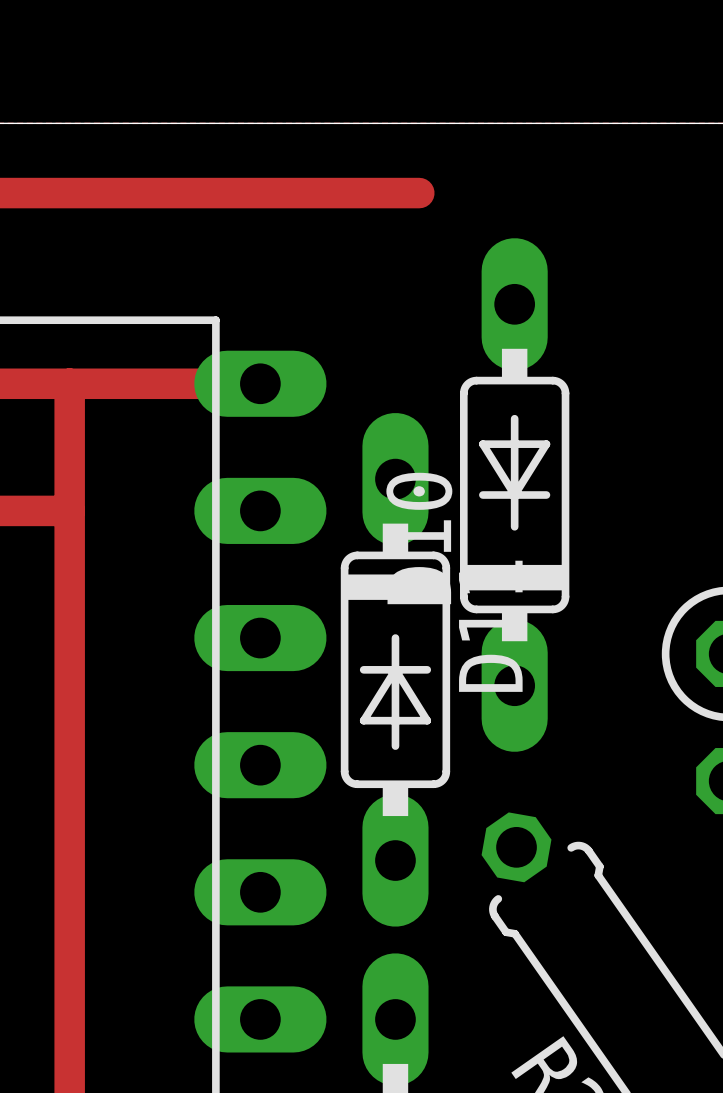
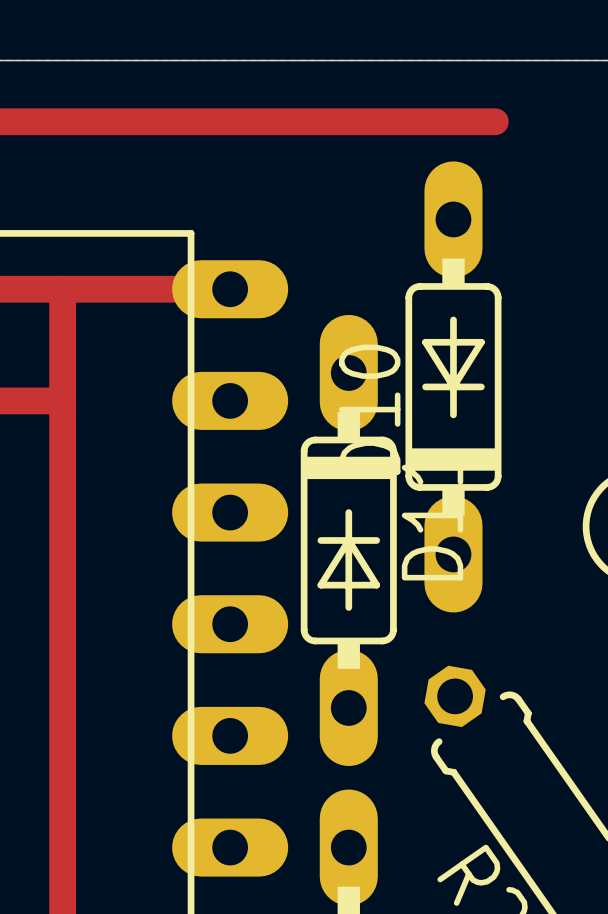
track: none -> (369, 121) (495, 121)

